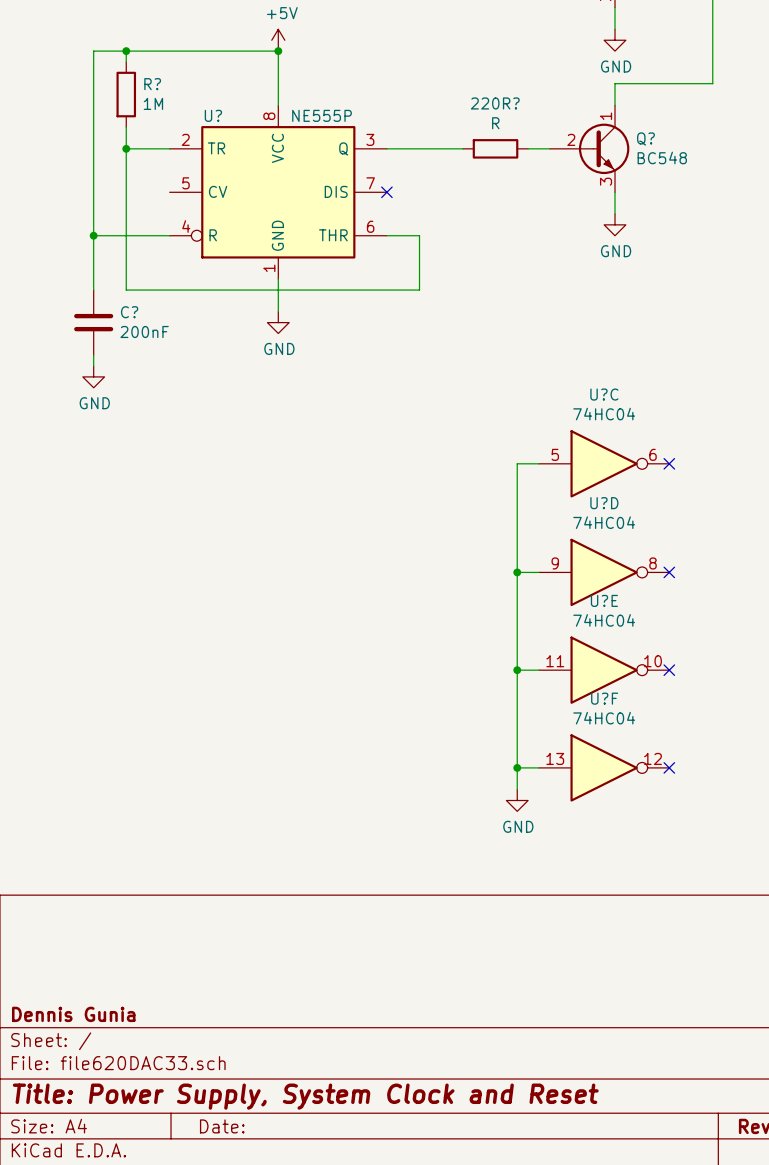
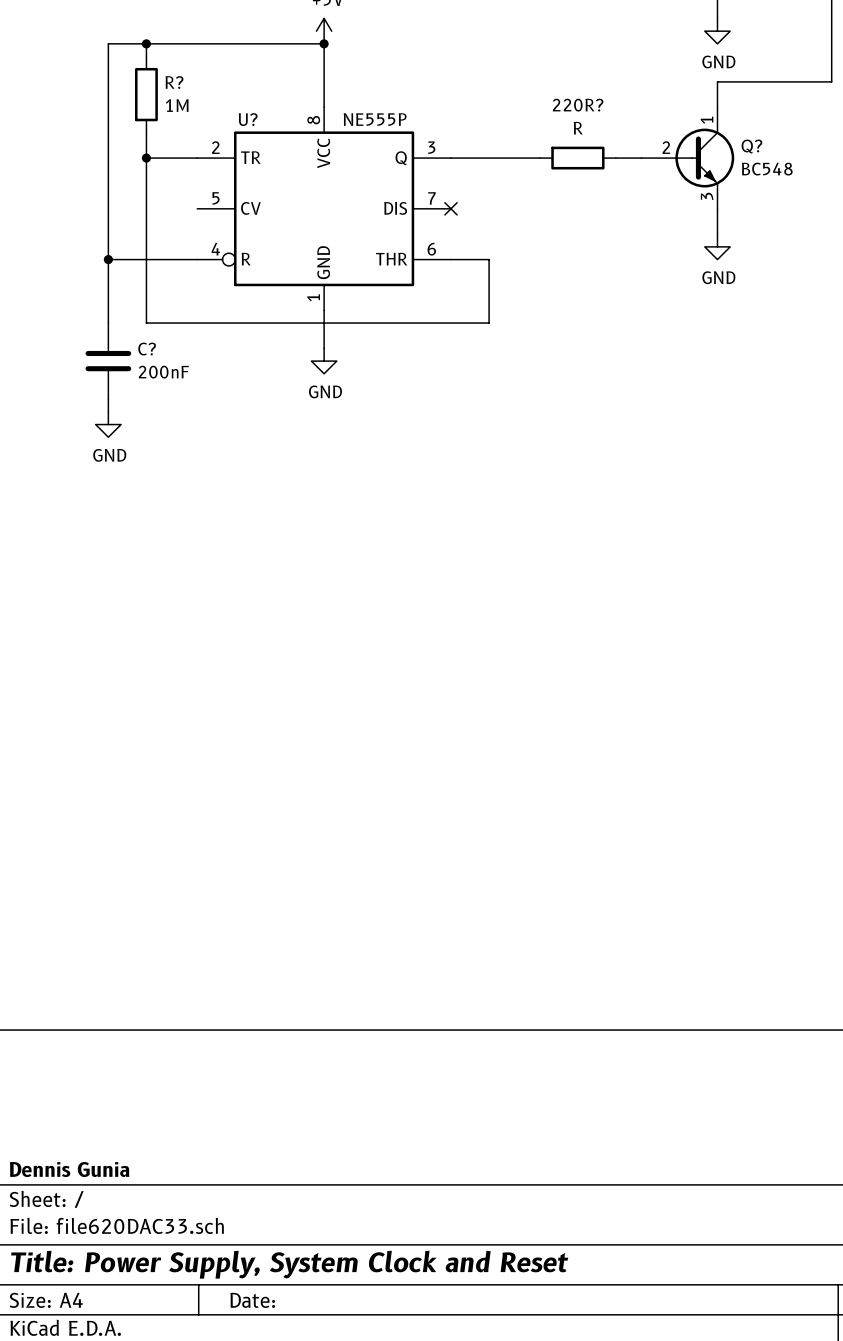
wire: (538, 463) (517, 463) (517, 789) -> none
U?C: 74HC04 (604, 463) -> none
no-connect mark: (669, 463) -> none
wire: (517, 572) (538, 572) -> none
junction: (517, 572) -> none
U?D: 74HC04 (604, 572) -> none
no-connect mark: (669, 572) -> none
wire: (517, 670) (538, 670) -> none
junction: (517, 670) -> none
U?E: 74HC04 (604, 670) -> none
no-connect mark: (669, 670) -> none
wire: (517, 767) (538, 767) -> none
junction: (517, 767) -> none
U?F: 74HC04 (604, 767) -> none
no-connect mark: (669, 767) -> none
power symbol: GND (517, 800) -> none

